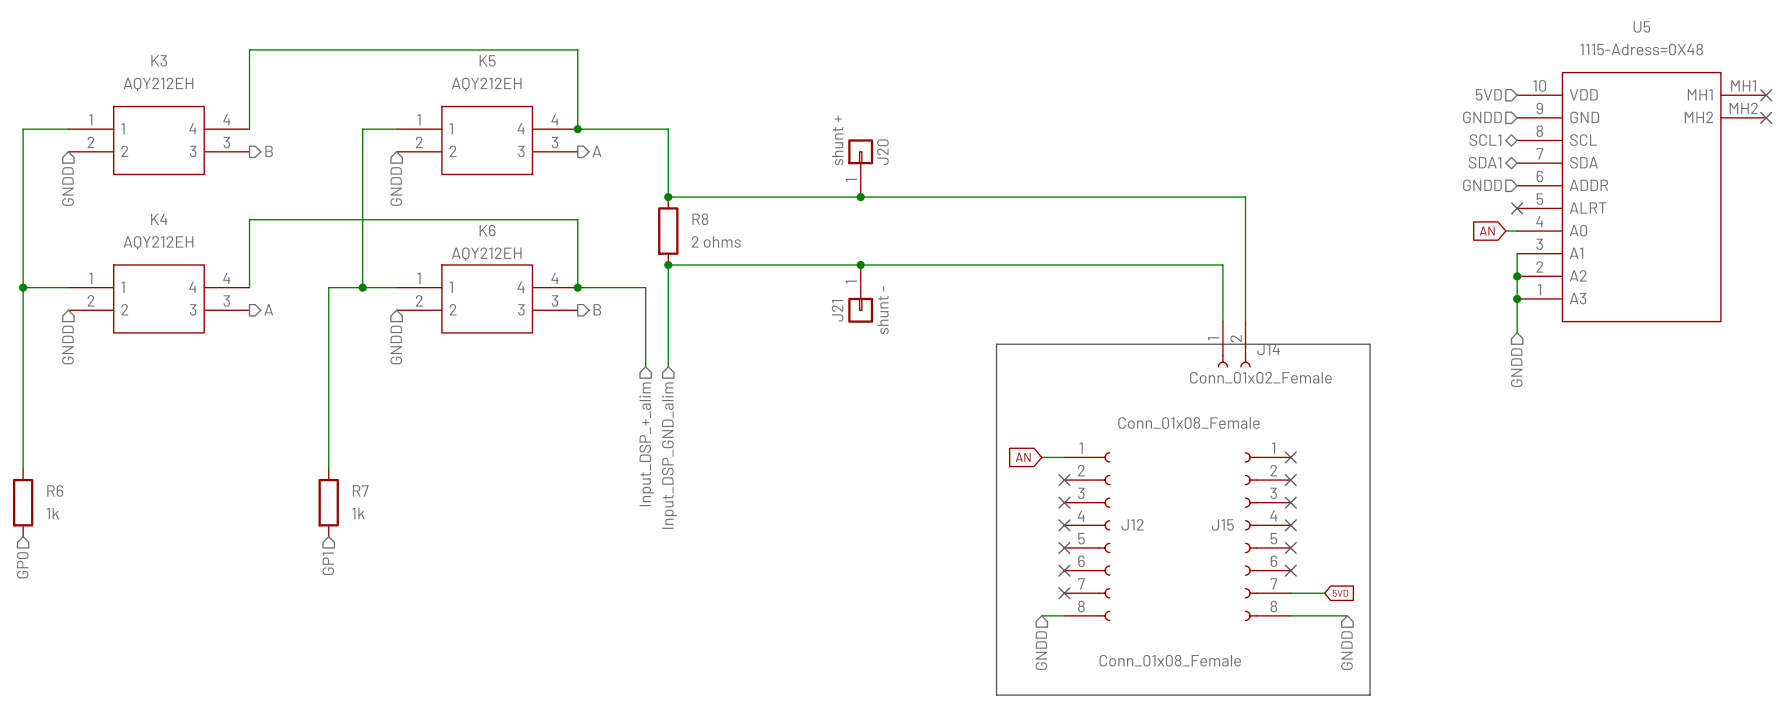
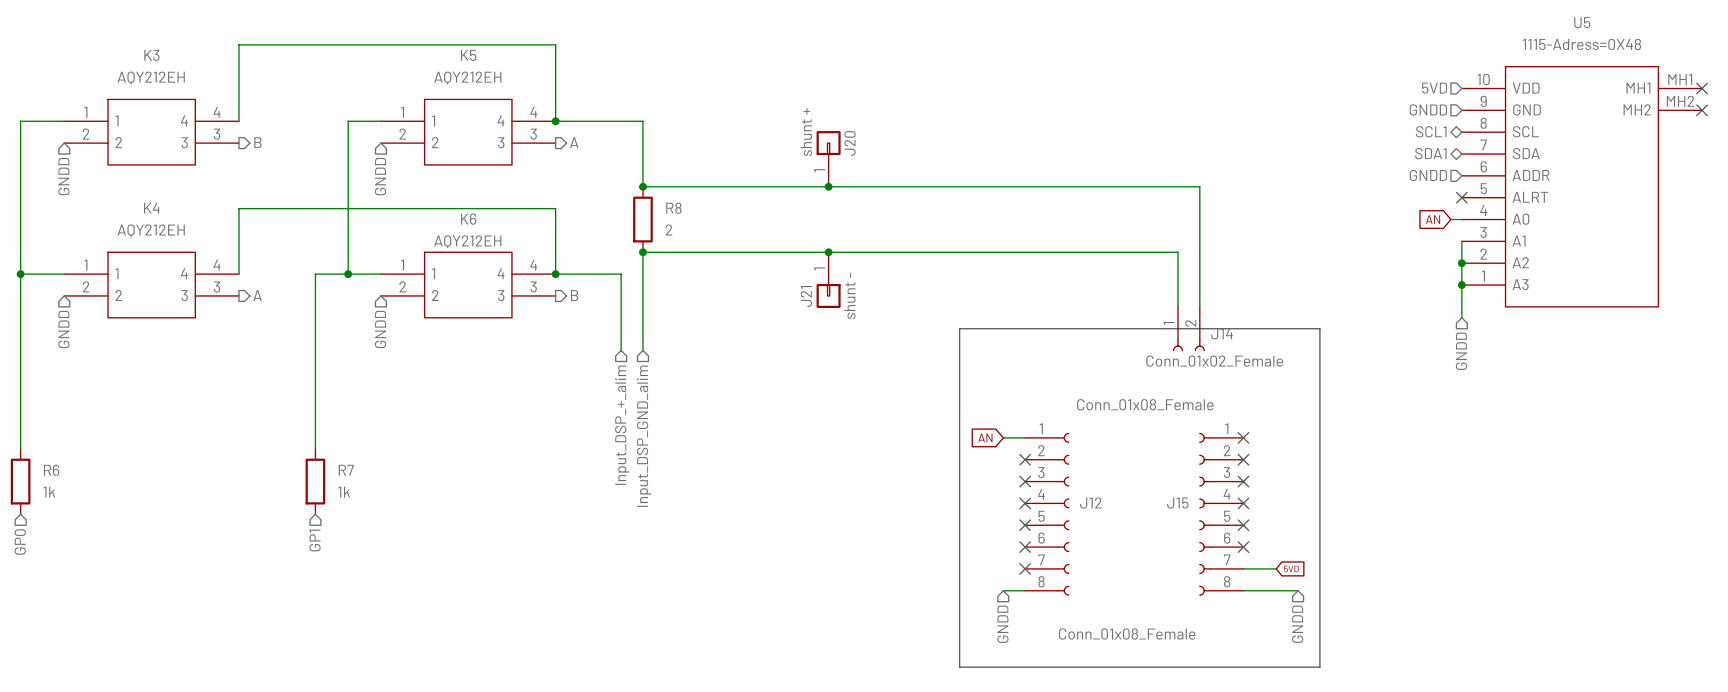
R8 value: 2 ohms (716, 241) -> 2 (668, 229)

